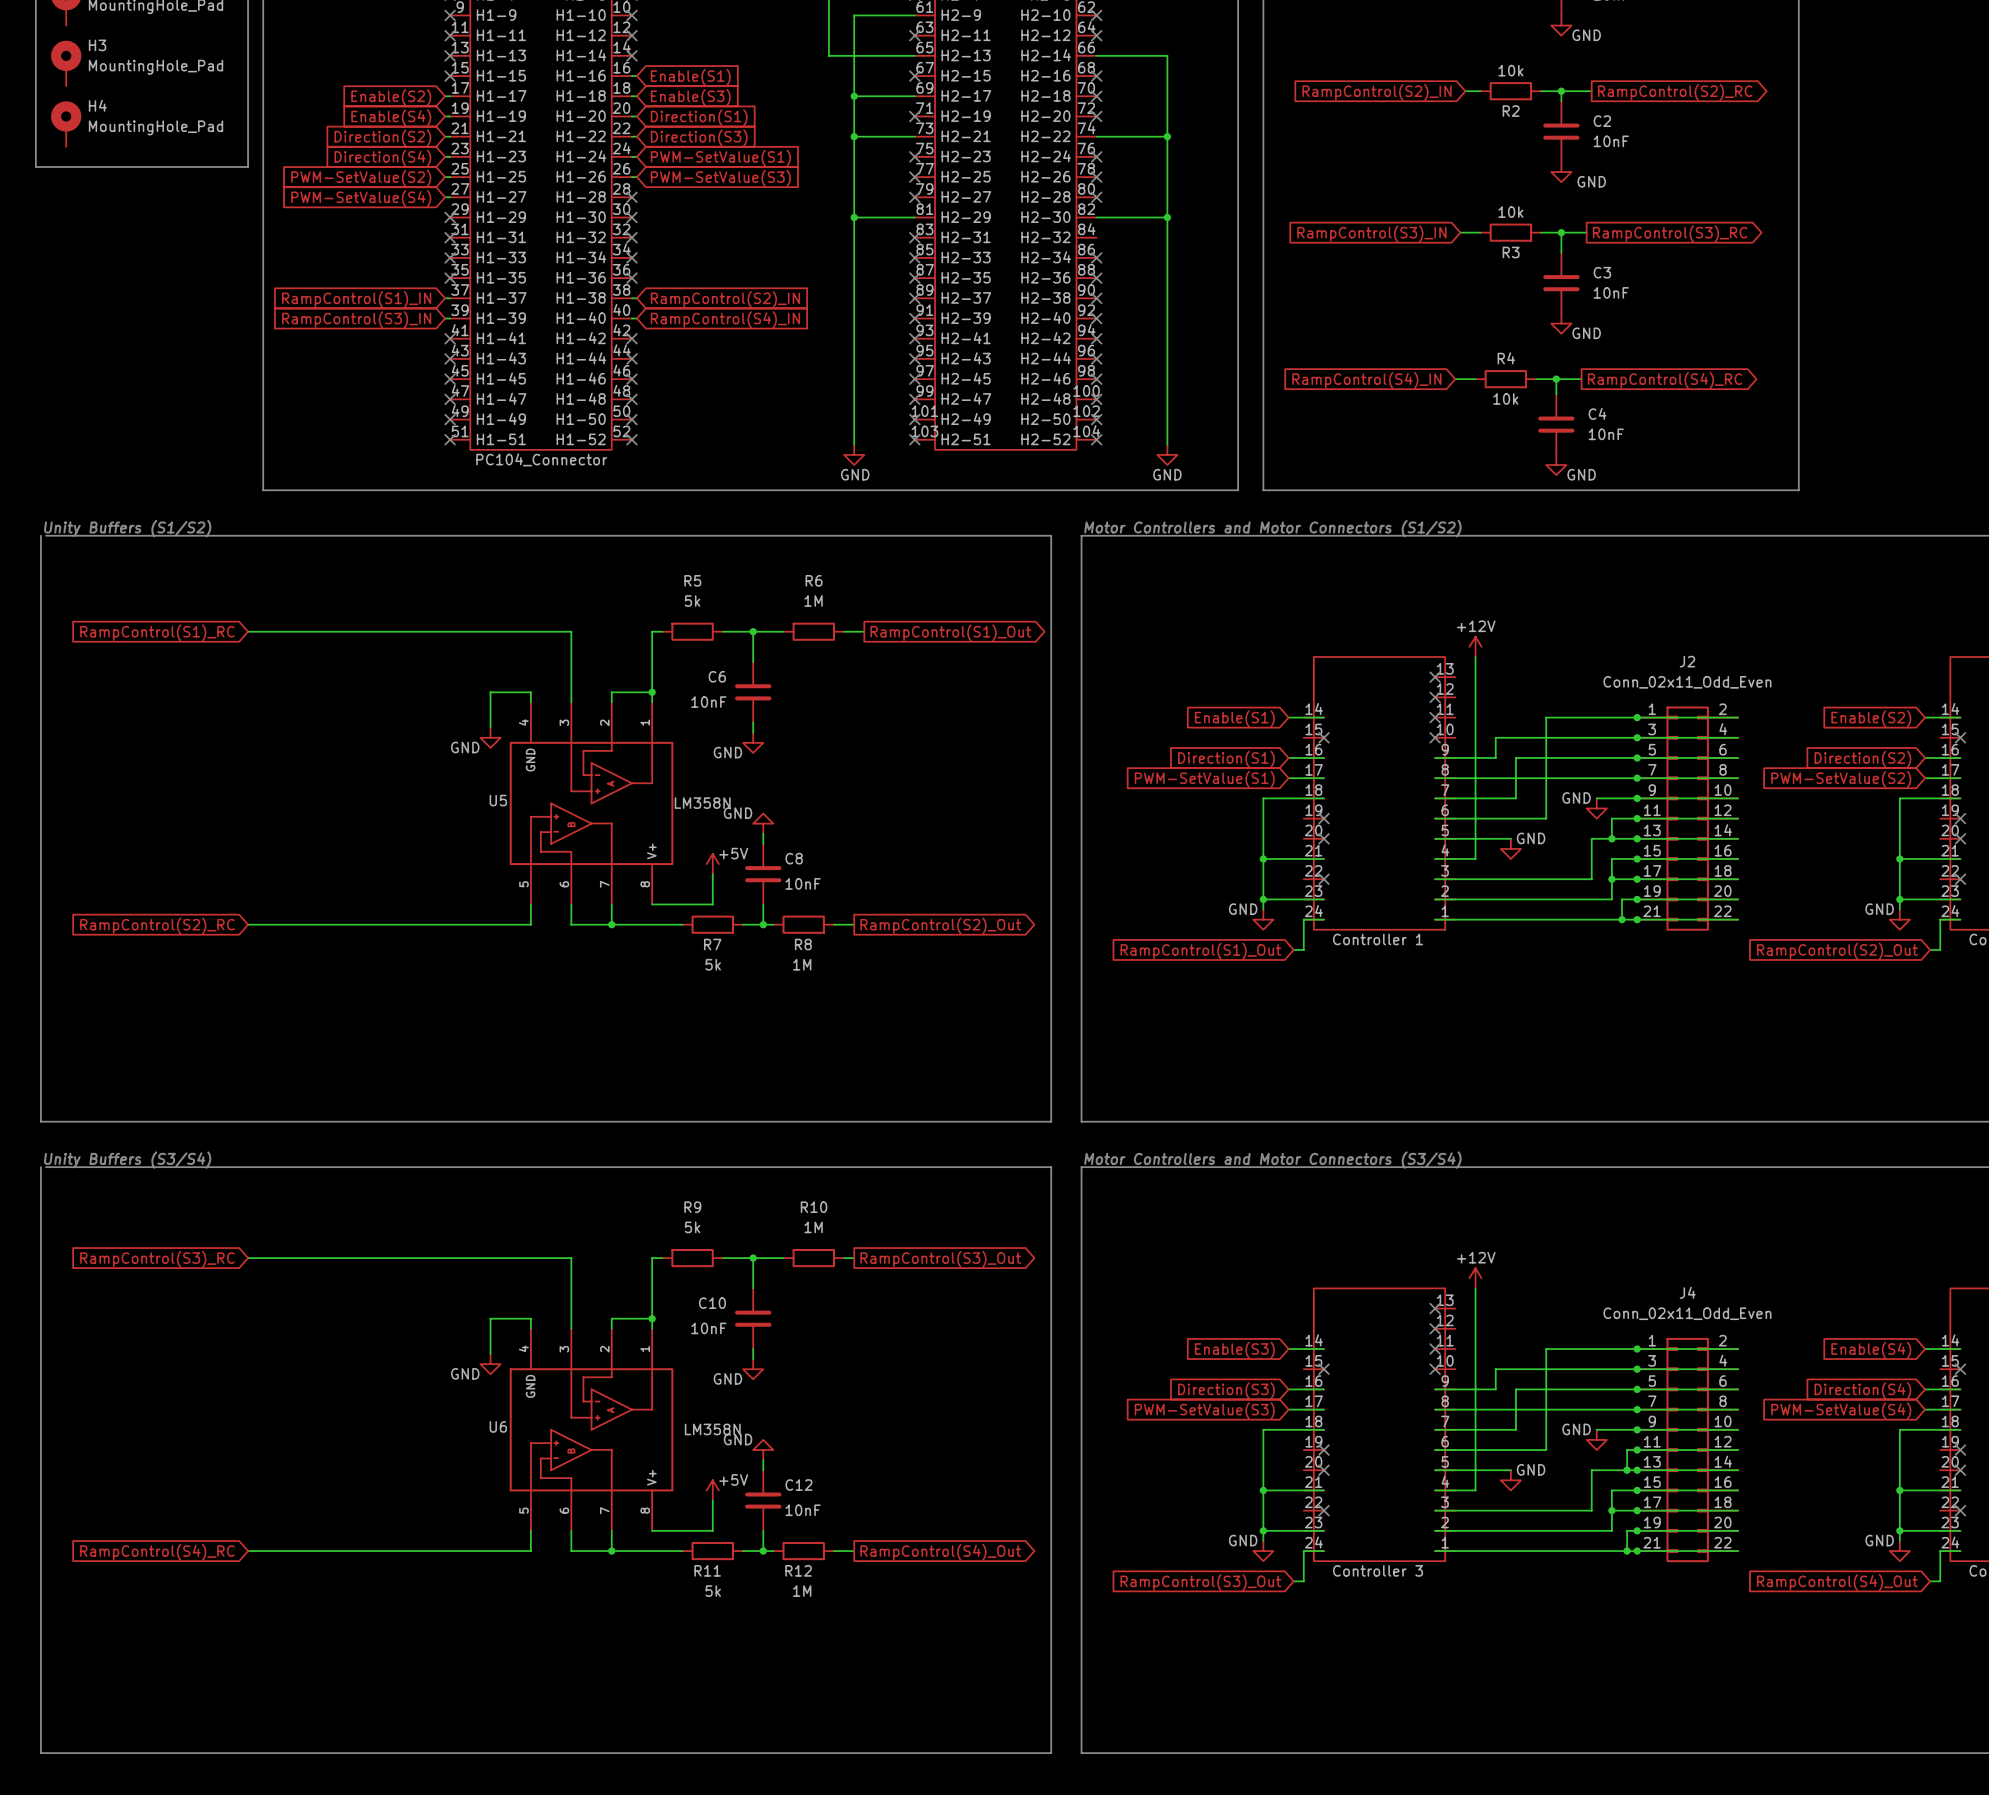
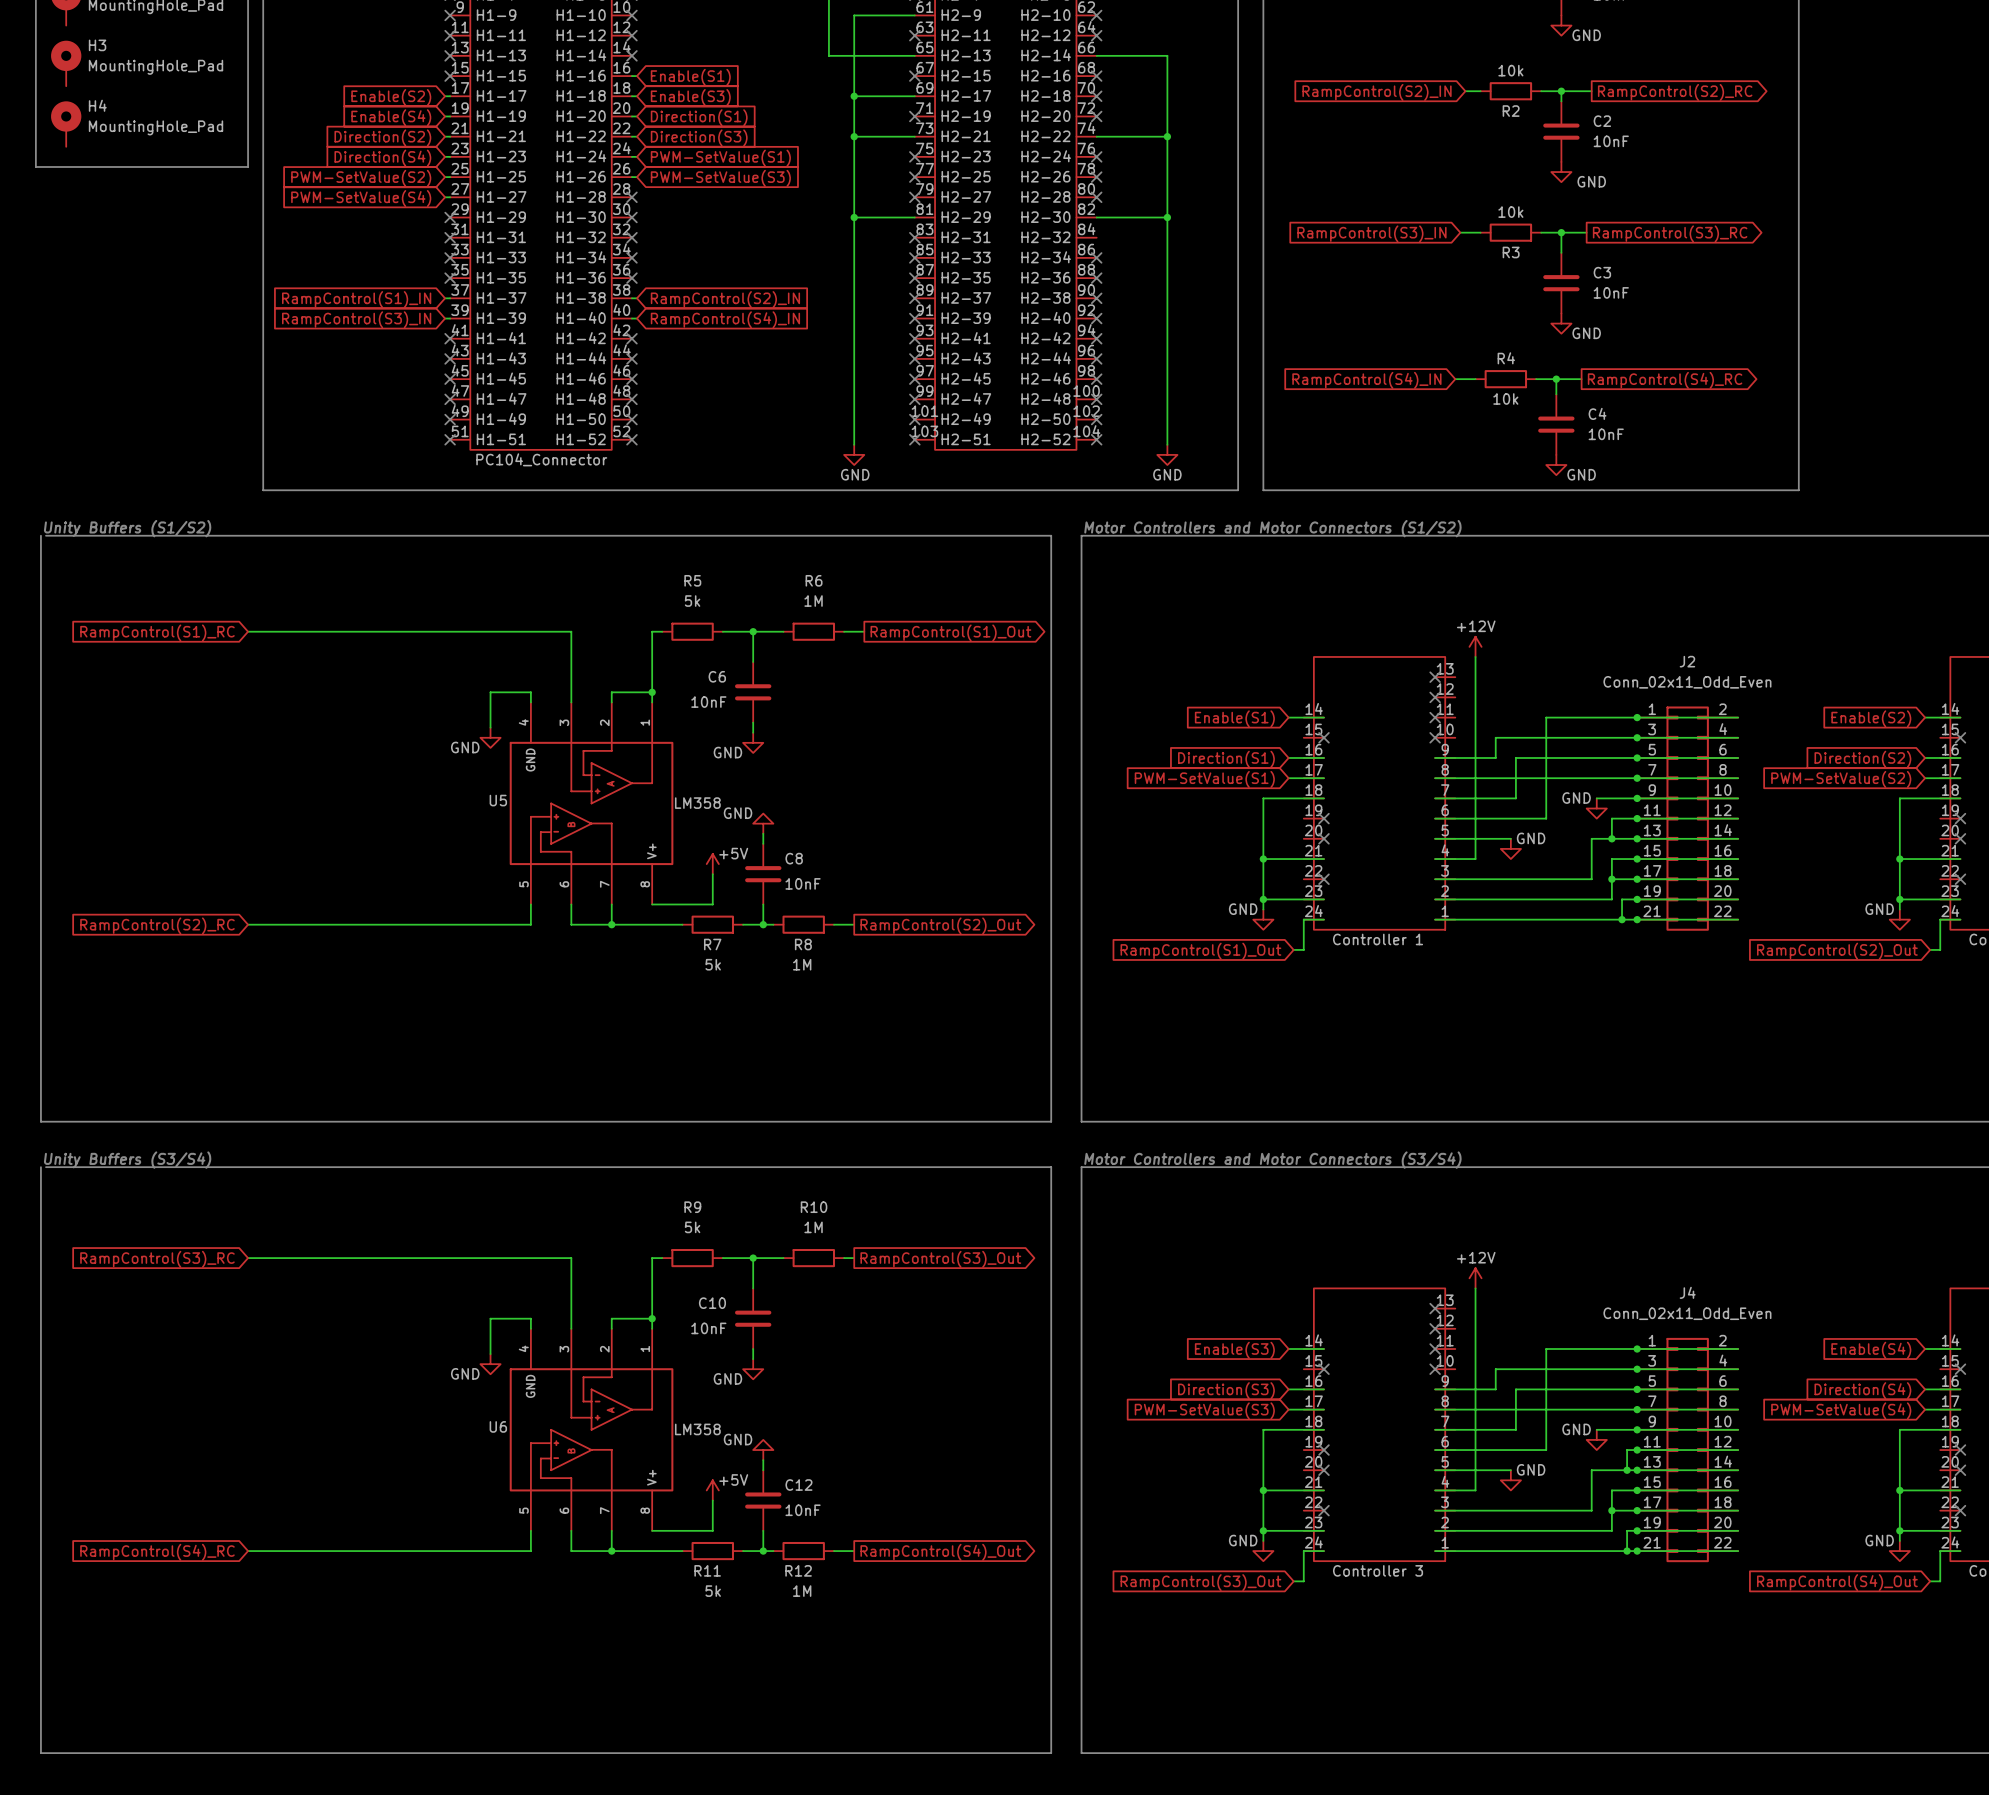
U5 value: LM358N (702, 803) -> LM358 (697, 803)
U6 value: LM358N (712, 1429) -> LM358 (697, 1429)

